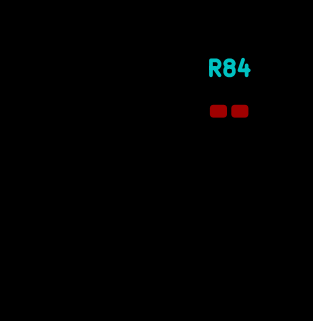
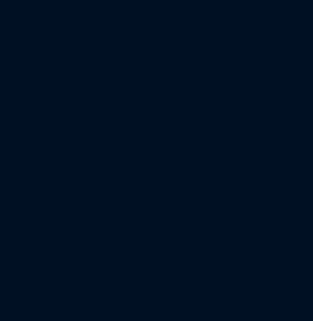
R84: (229, 111) -> none

